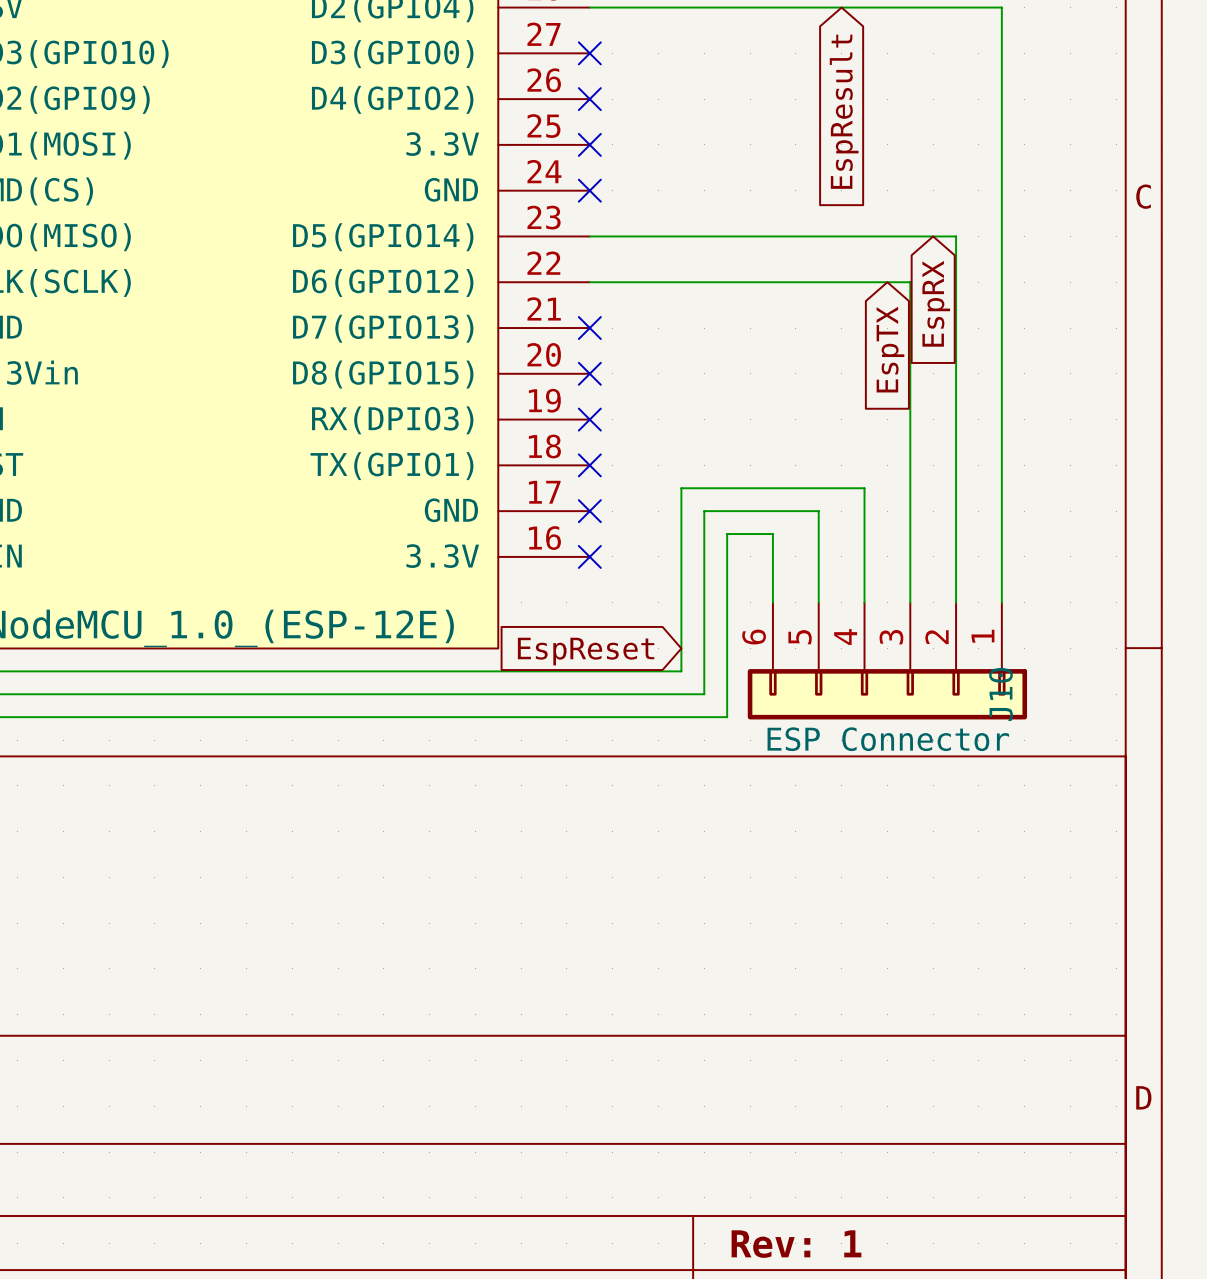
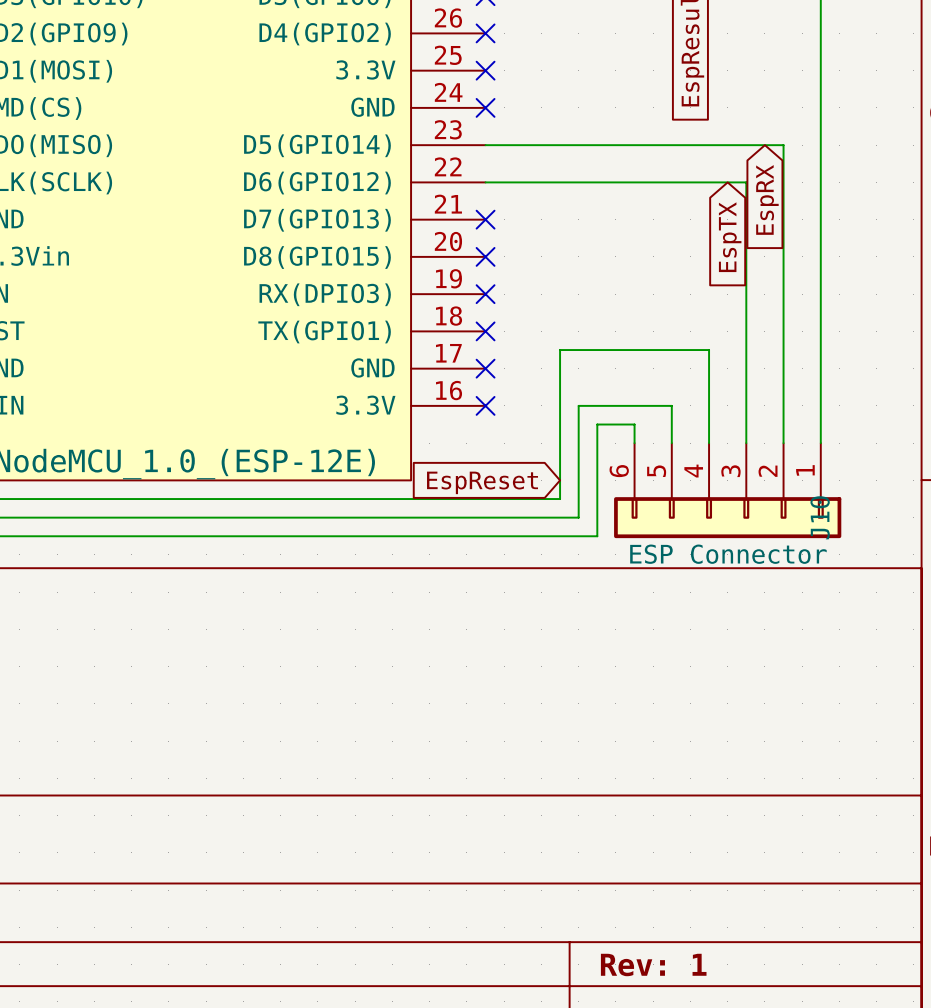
wire: (704, 556) (704, 511) (818, 511) (818, 556) -> (578, 405) (671, 405)
wire: (727, 579) (727, 534) (772, 534) (772, 579) -> (597, 424) (634, 424)

